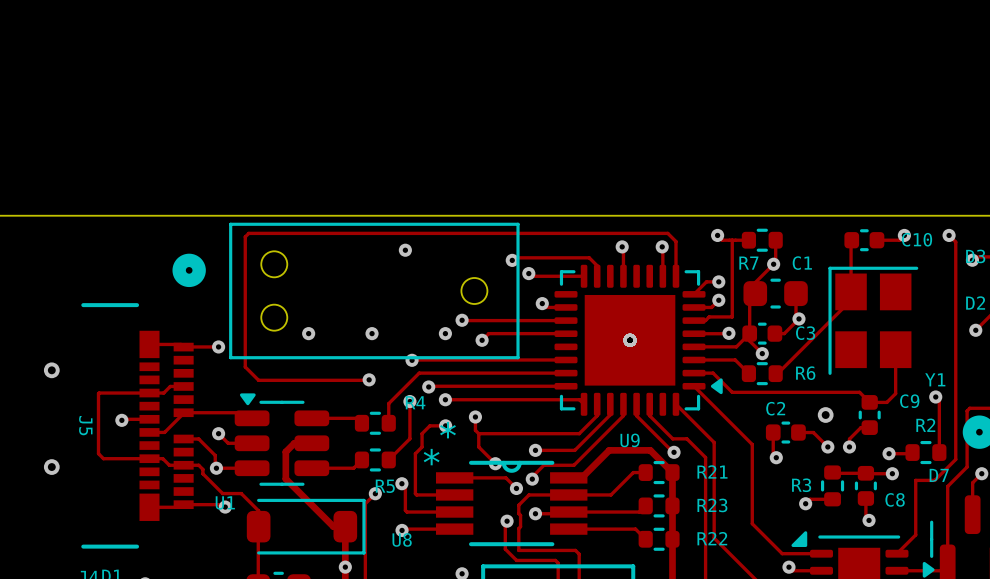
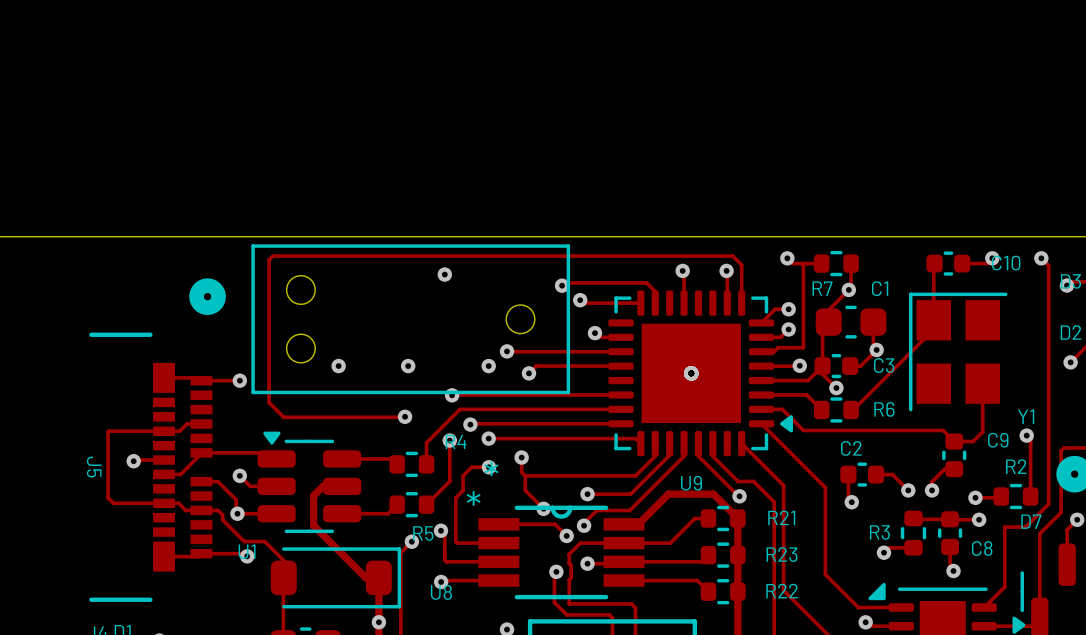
via: (51, 370) -> none
via: (825, 415) -> none
via: (51, 467) -> none

